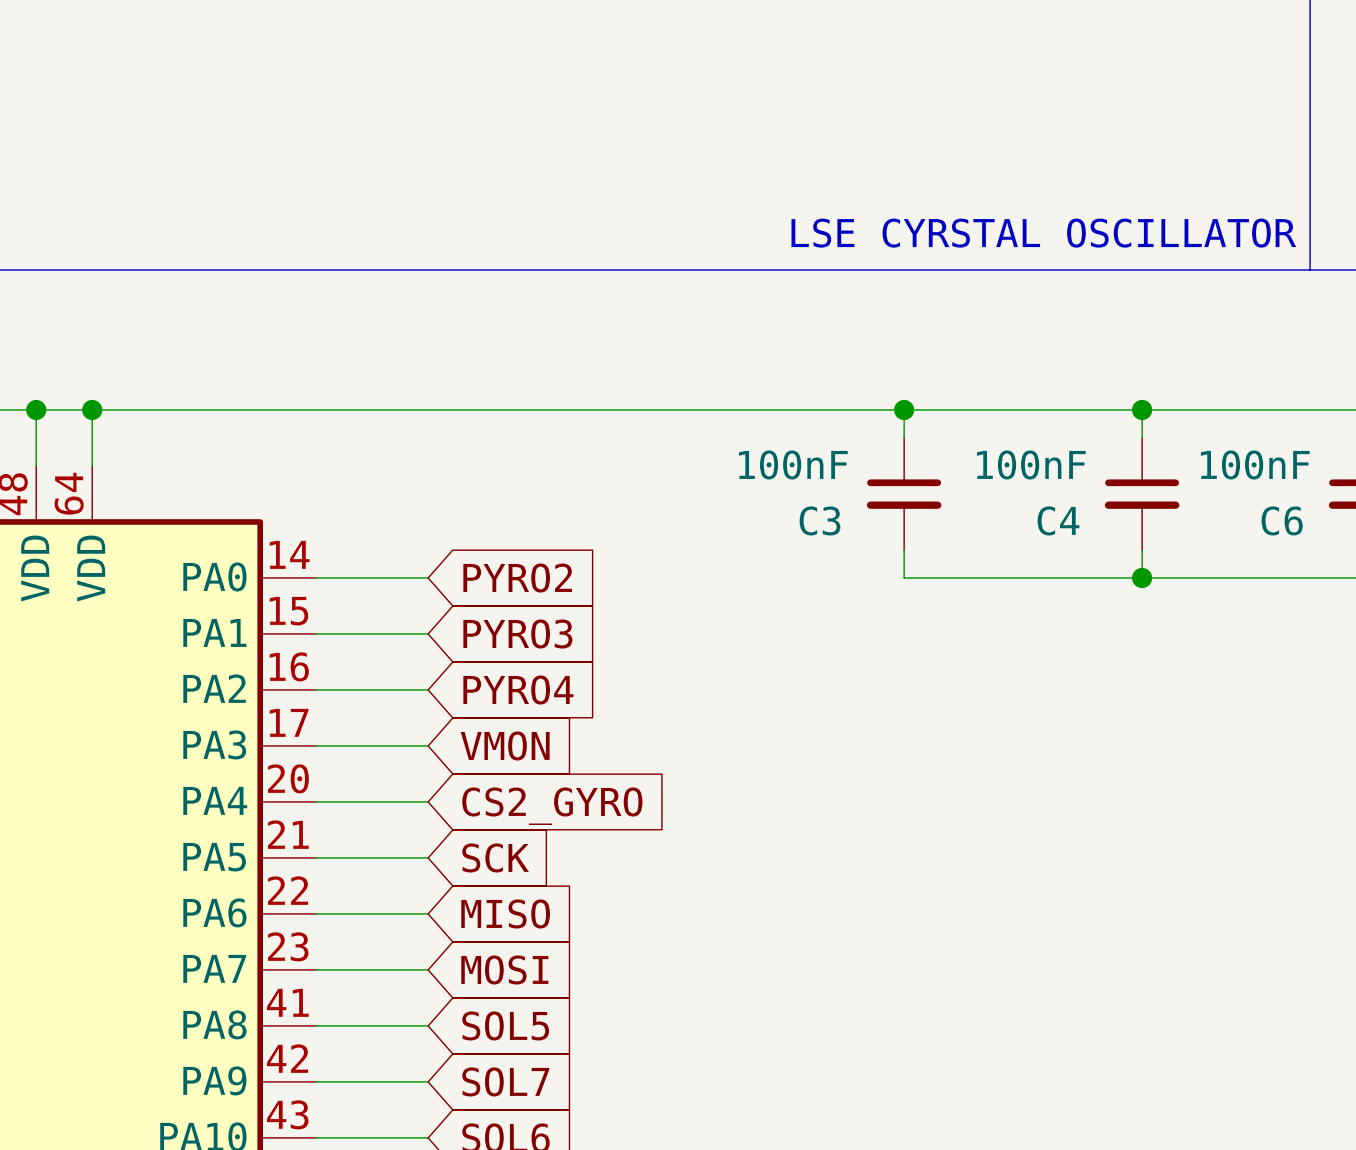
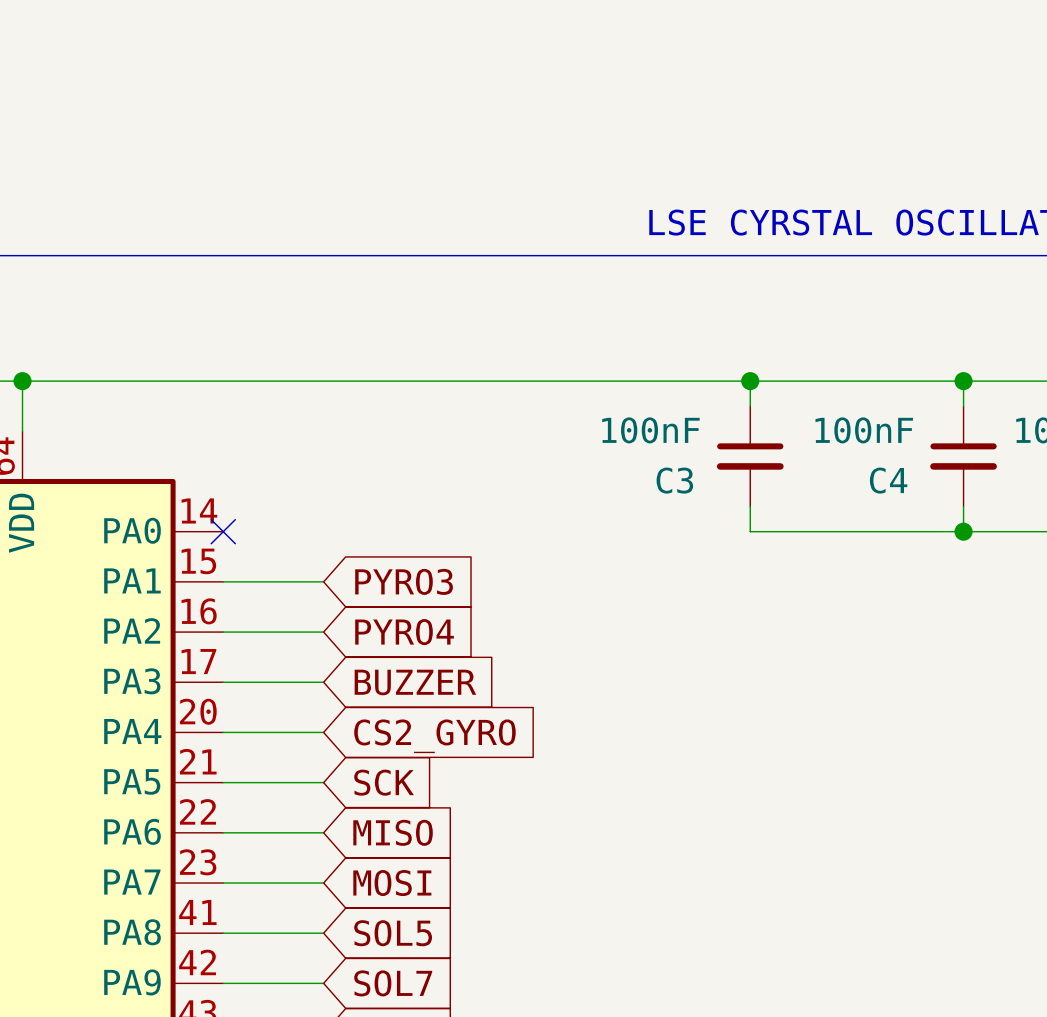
wire: (316, 577) (428, 577) -> none
no-connect mark: none -> (223, 531)
global label: PYRO2 (517, 578) -> none
global label: VMON (505, 745) -> BUZZER (415, 682)

